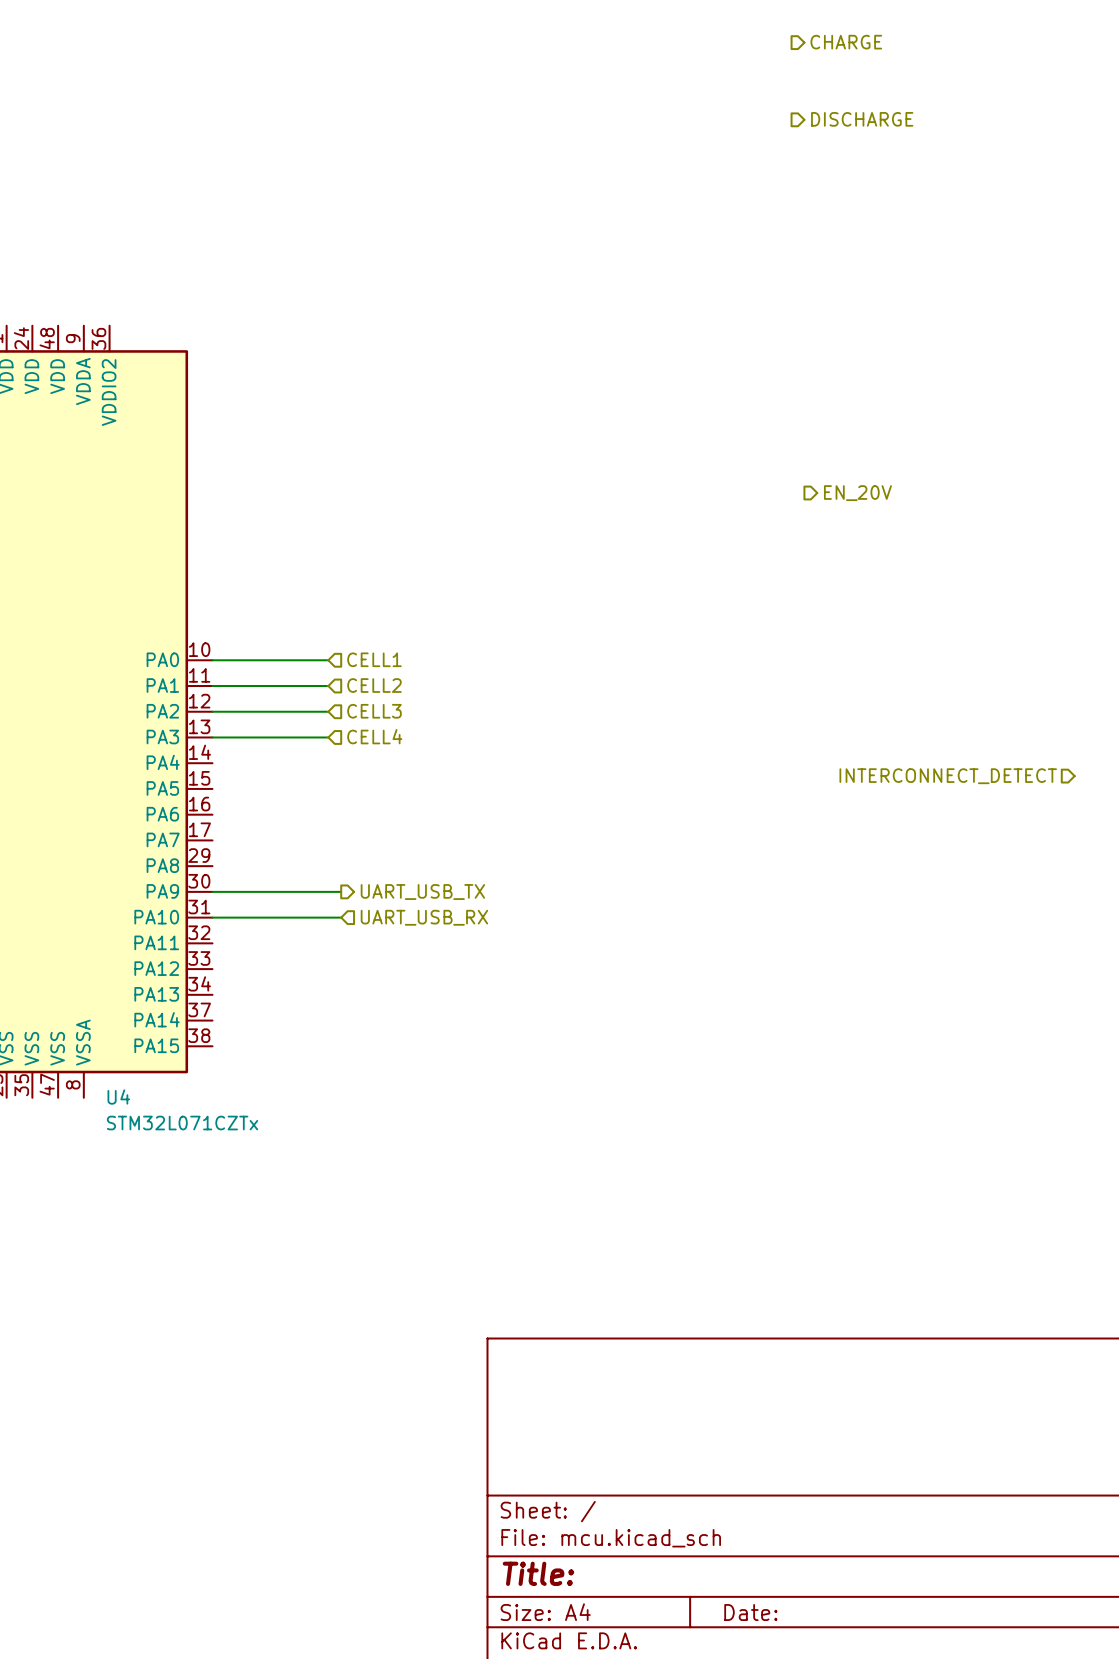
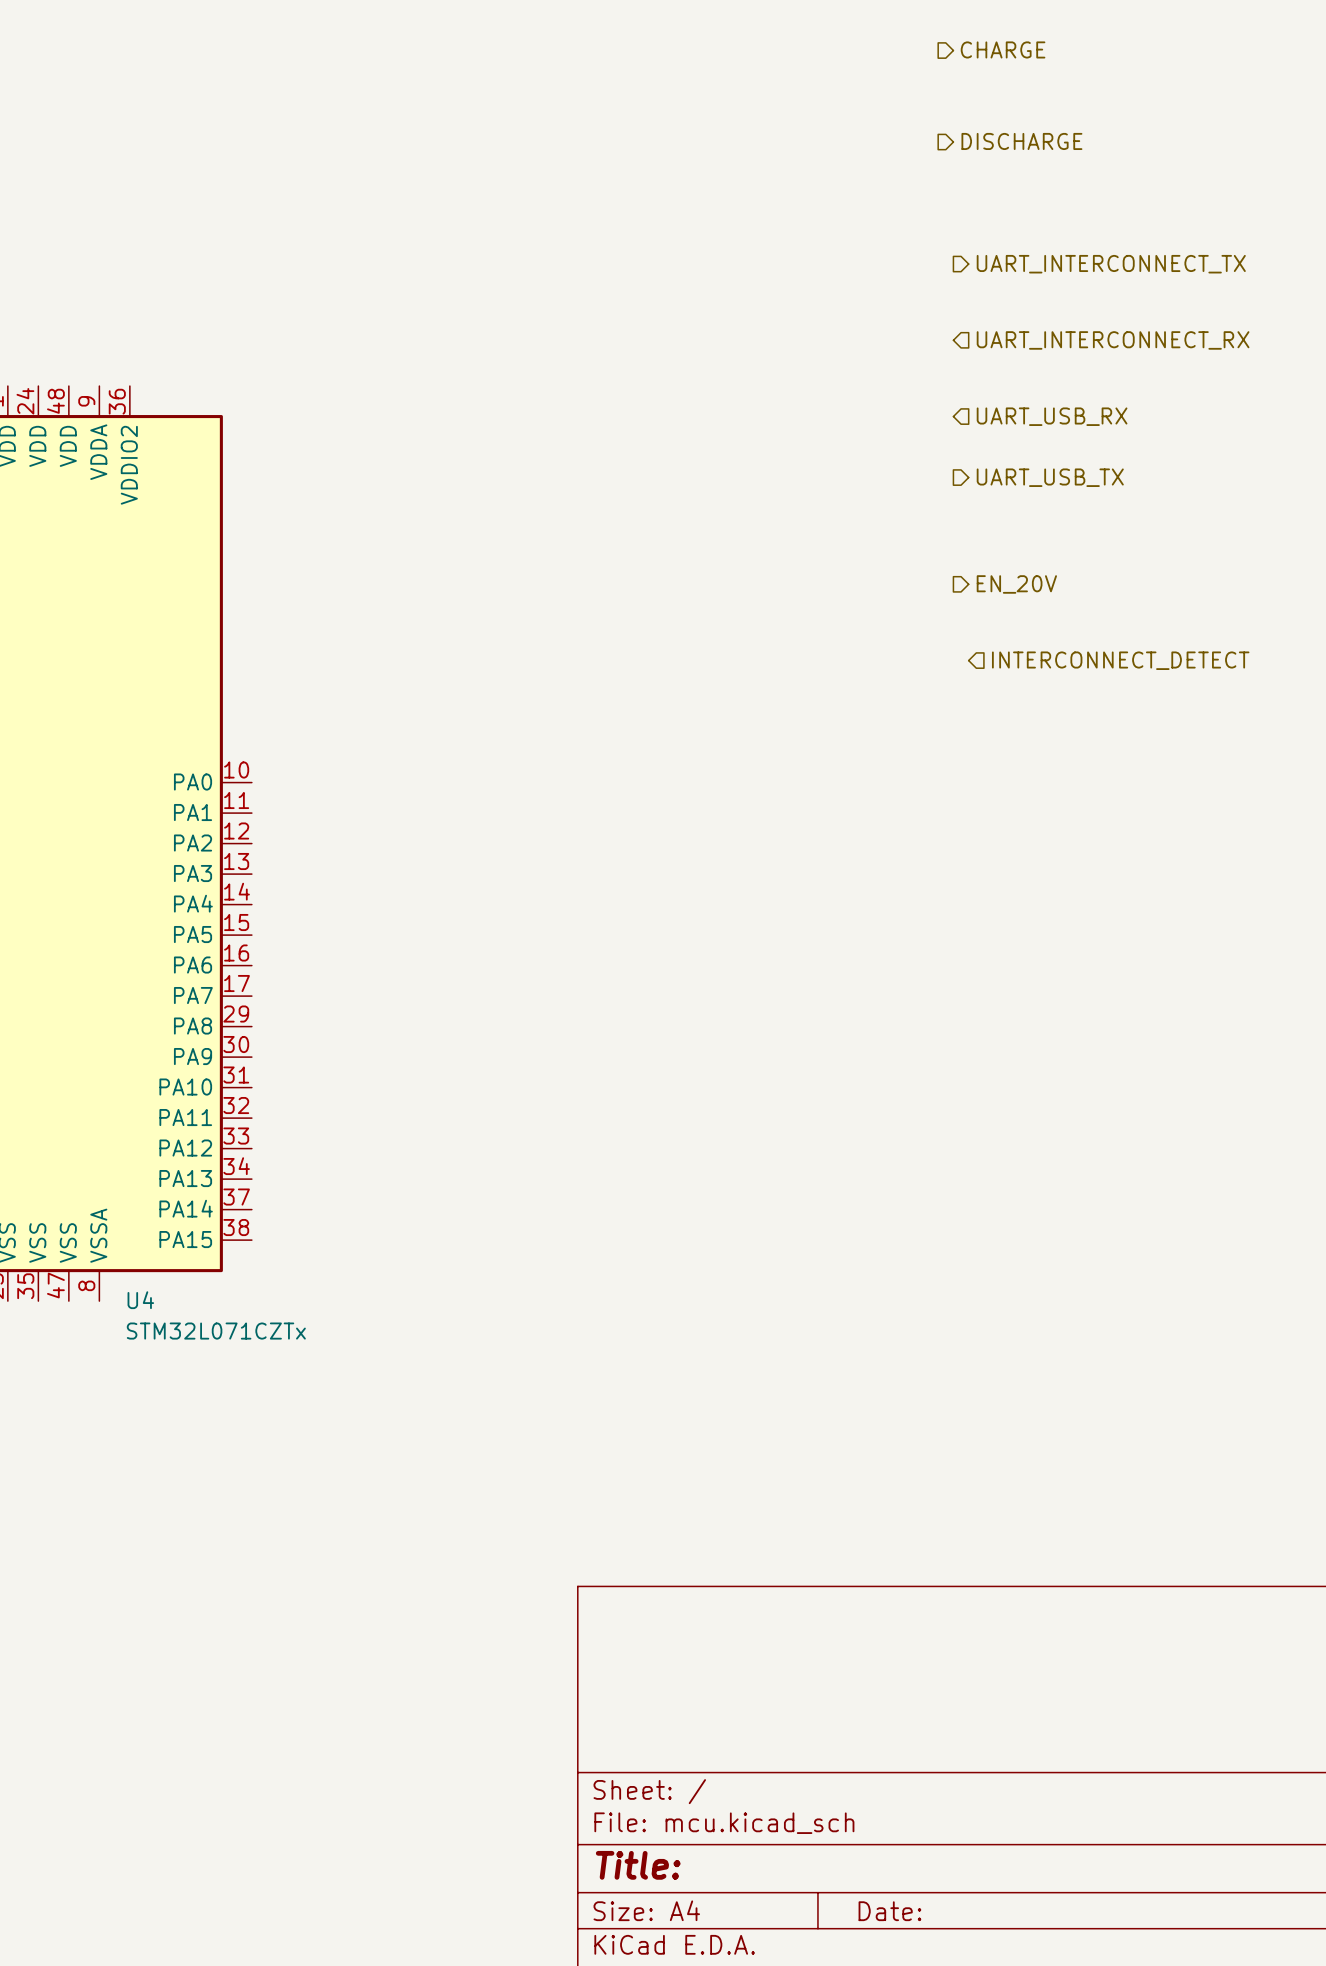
hierarchical label: none -> UART_INTERCONNECT_TX (1111, 264)
hierarchical label: none -> UART_INTERCONNECT_RX (1113, 340)
hierarchical label: none -> UART_USB_RX (1052, 416)
hierarchical label: none -> UART_USB_TX (1050, 477)
hierarchical label: none -> INTERCONNECT_DETECT (1120, 660)
hierarchical label: CELL1 (374, 659) -> none
wire: (212, 660) (328, 660) -> none
hierarchical label: CELL2 (374, 685) -> none
wire: (212, 686) (328, 686) -> none
wire: (212, 711) (328, 711) -> none
hierarchical label: CELL3 (374, 711) -> none
hierarchical label: CELL4 (374, 736) -> none
wire: (212, 737) (328, 737) -> none
hierarchical label: INTERCONNECT_DETECT (948, 776) -> none
wire: (212, 891) (341, 891) -> none
hierarchical label: UART_USB_TX (422, 892) -> none
wire: (212, 917) (341, 917) -> none
hierarchical label: UART_USB_RX (424, 917) -> none

